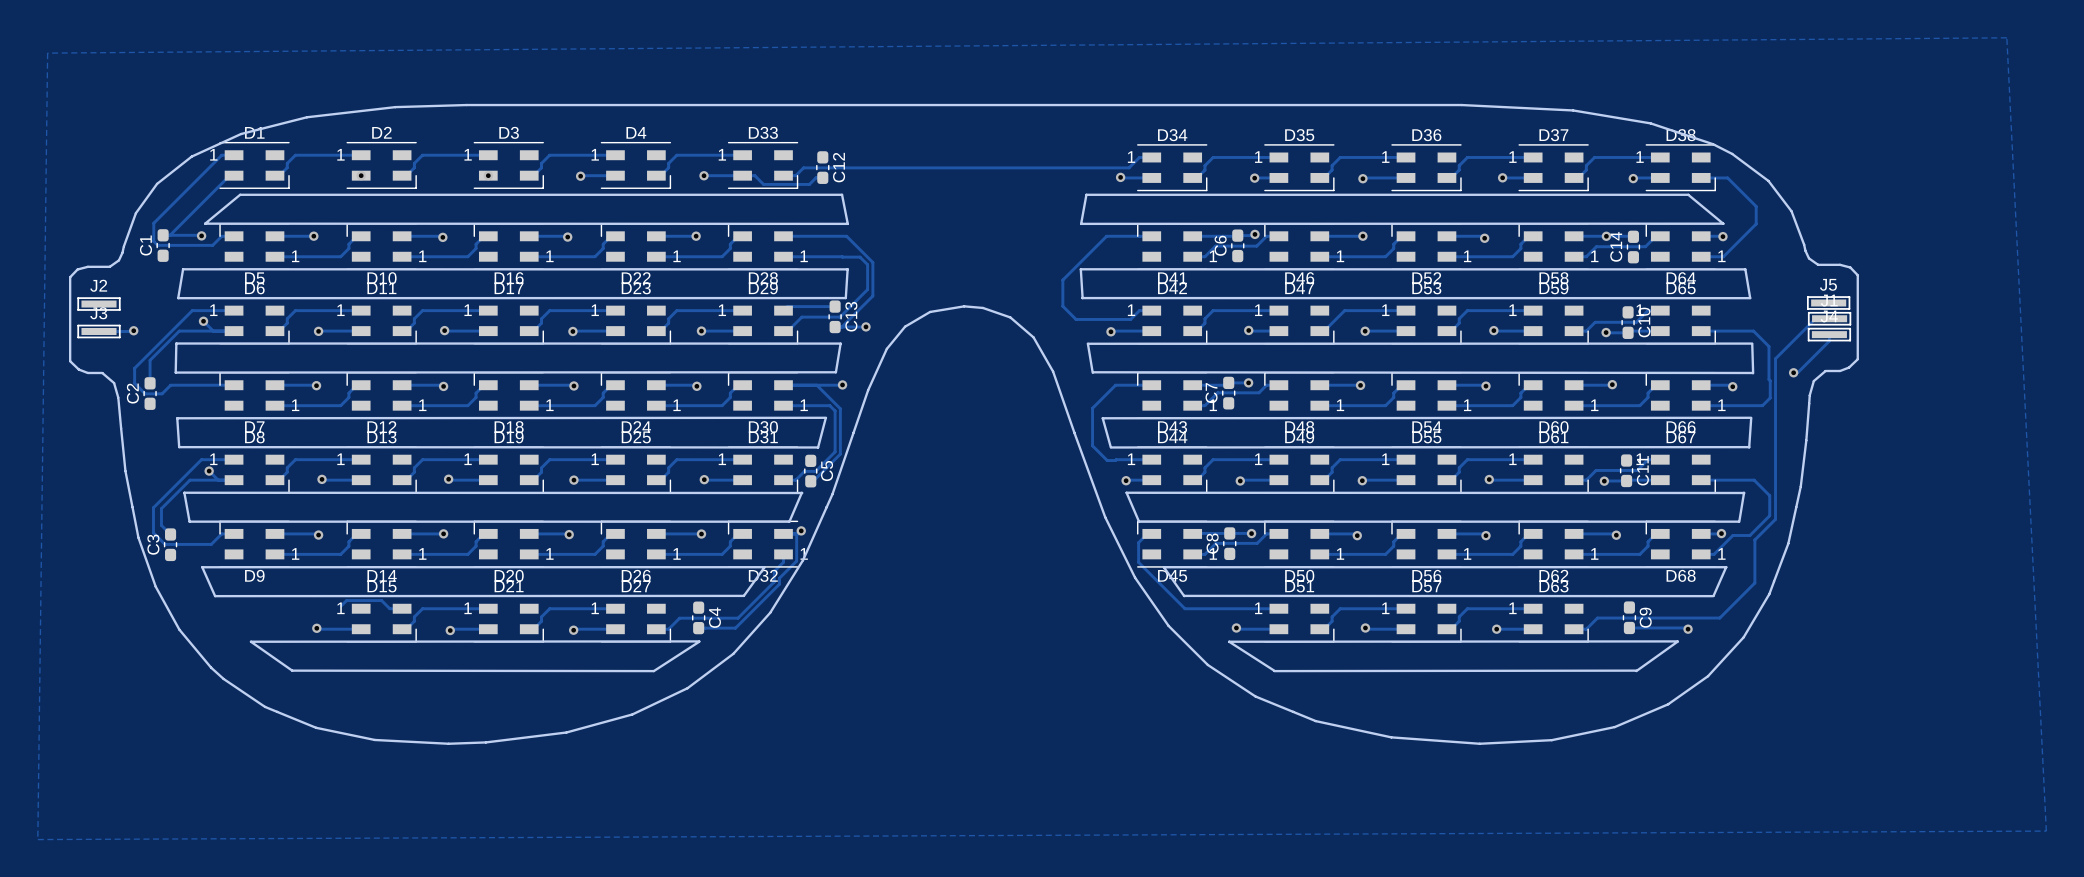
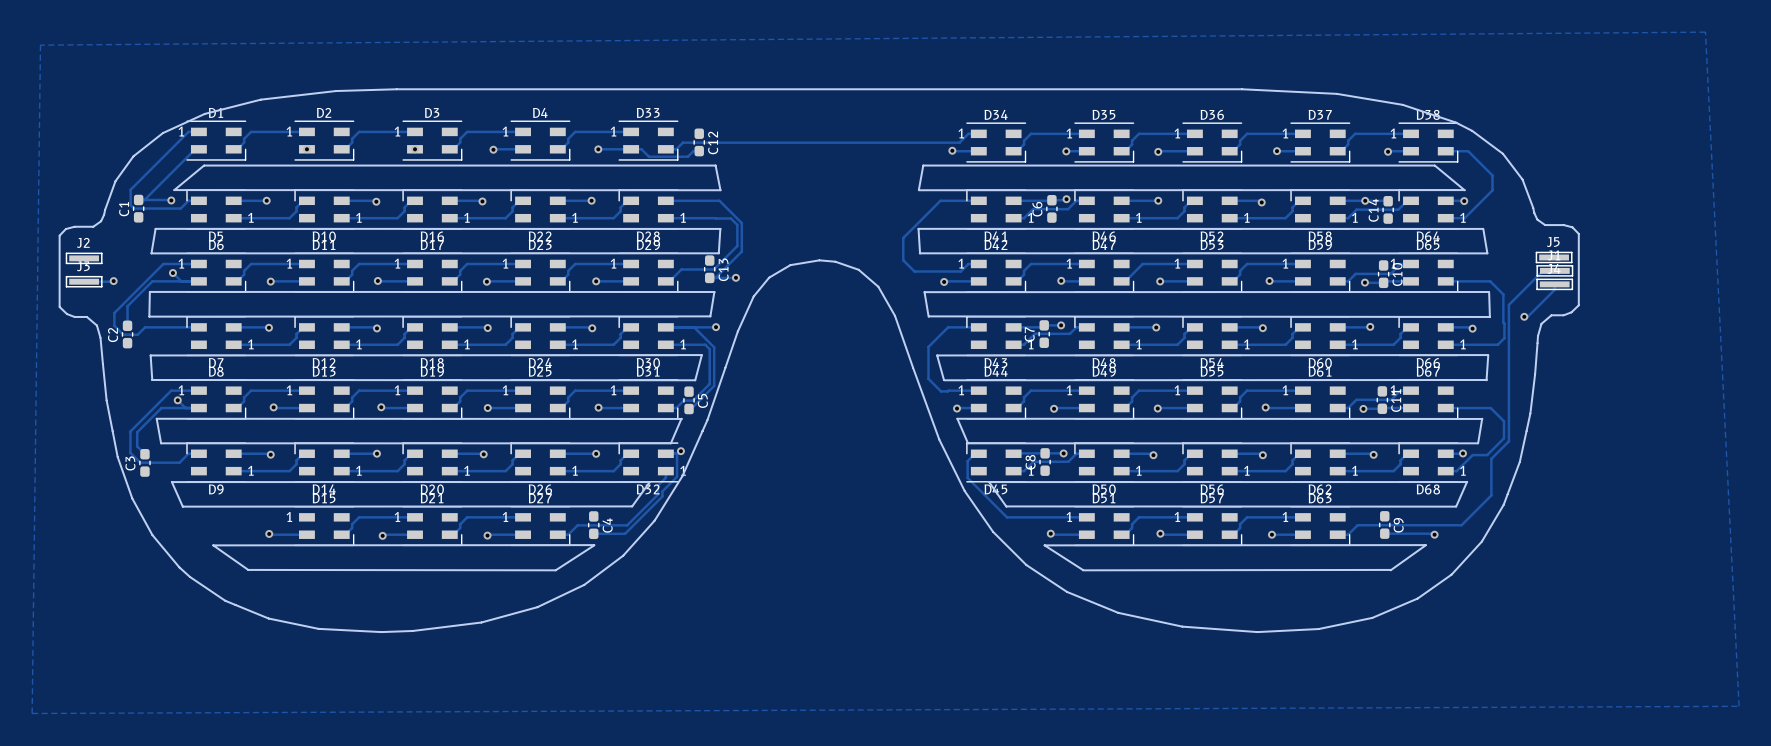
track: (835, 306) (787, 306) (783, 310) -> none
track: (341, 606) (346, 600) (381, 600) (389, 608) (402, 608) -> none

